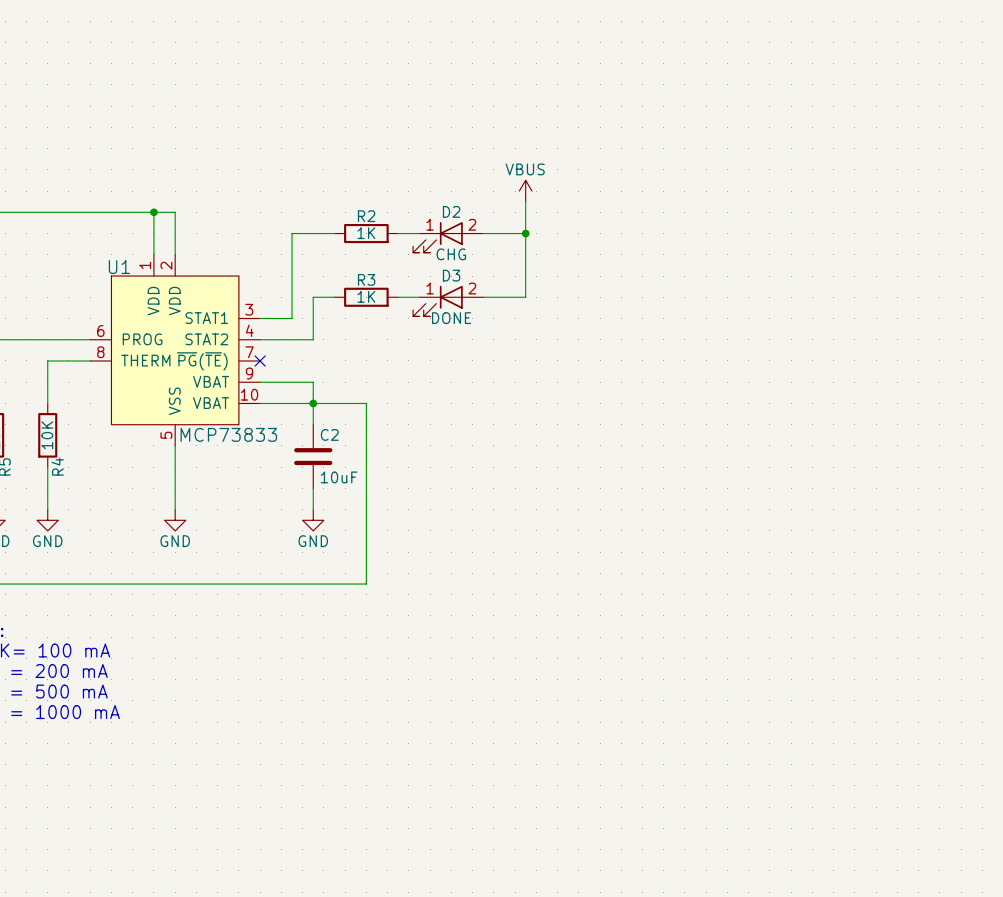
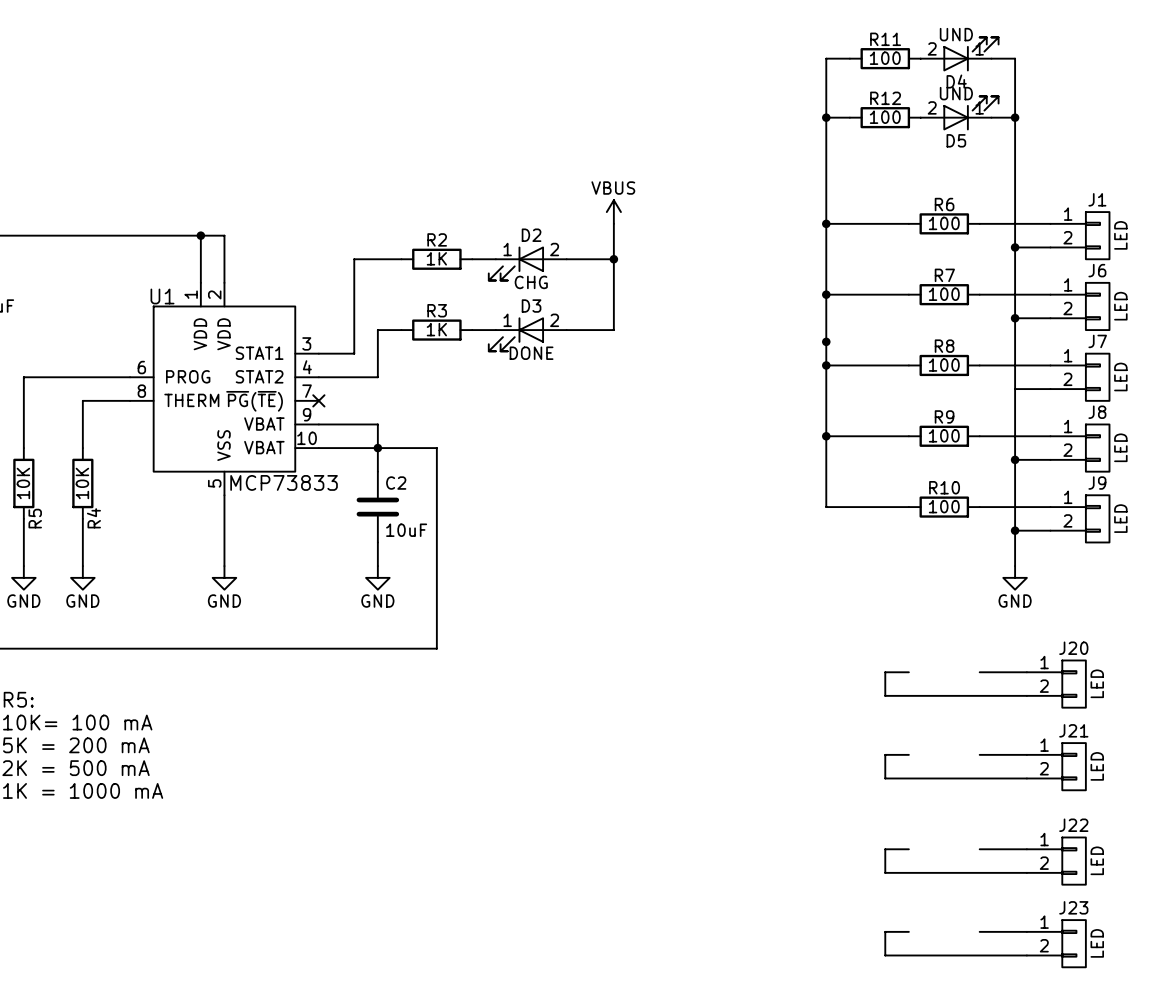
D4: none -> UND (959, 54)
wire: none -> (849, 58) (826, 58) (826, 507) (908, 507)
R11: none -> 100 (885, 58)
wire: none -> (991, 58) (1015, 58) (1015, 566)
D5: none -> UND (959, 113)
wire: none -> (826, 117) (849, 117)
junction: none -> (826, 117)
R12: none -> 100 (885, 117)
wire: none -> (991, 117) (1015, 117)
junction: none -> (1015, 117)
wire: none -> (826, 223) (908, 223)
junction: none -> (826, 223)
R6: none -> 100 (944, 223)
wire: none -> (979, 223) (1050, 223)
J1: none -> LED (1079, 235)
wire: none -> (1015, 247) (1050, 247)
junction: none -> (1015, 247)
wire: none -> (826, 294) (908, 294)
junction: none -> (826, 294)
R7: none -> 100 (944, 294)
wire: none -> (979, 294) (1050, 294)
J6: none -> LED (1079, 306)
wire: none -> (1015, 318) (1050, 318)
junction: none -> (1015, 318)
junction: none -> (826, 341)
wire: none -> (826, 365) (908, 365)
junction: none -> (826, 365)
R8: none -> 100 (944, 365)
wire: none -> (979, 365) (1050, 365)
J7: none -> LED (1079, 377)
wire: none -> (1015, 389) (1050, 389)
wire: none -> (826, 436) (908, 436)
junction: none -> (826, 436)
R9: none -> 100 (944, 436)
wire: none -> (979, 436) (1050, 436)
J8: none -> LED (1079, 448)
wire: none -> (1015, 459) (1050, 459)
junction: none -> (1015, 459)
R10: none -> 100 (944, 507)
wire: none -> (979, 507) (1050, 507)
J9: none -> LED (1079, 518)
wire: none -> (1015, 530) (1050, 530)
junction: none -> (1015, 530)
power symbol: none -> GND (1015, 577)
wire: none -> (908, 672) (885, 672) (885, 695) (1026, 695)
wire: none -> (979, 672) (1026, 672)
J20: none -> LED (1056, 684)
wire: none -> (908, 754) (885, 754) (885, 778) (1026, 778)
wire: none -> (979, 754) (1026, 754)
J21: none -> LED (1056, 766)
wire: none -> (908, 849) (885, 849) (885, 872) (1026, 872)
wire: none -> (979, 849) (1026, 849)
J22: none -> LED (1056, 861)
wire: none -> (908, 931) (885, 931) (885, 955) (1026, 955)
wire: none -> (979, 931) (1026, 931)
J23: none -> LED (1056, 943)

